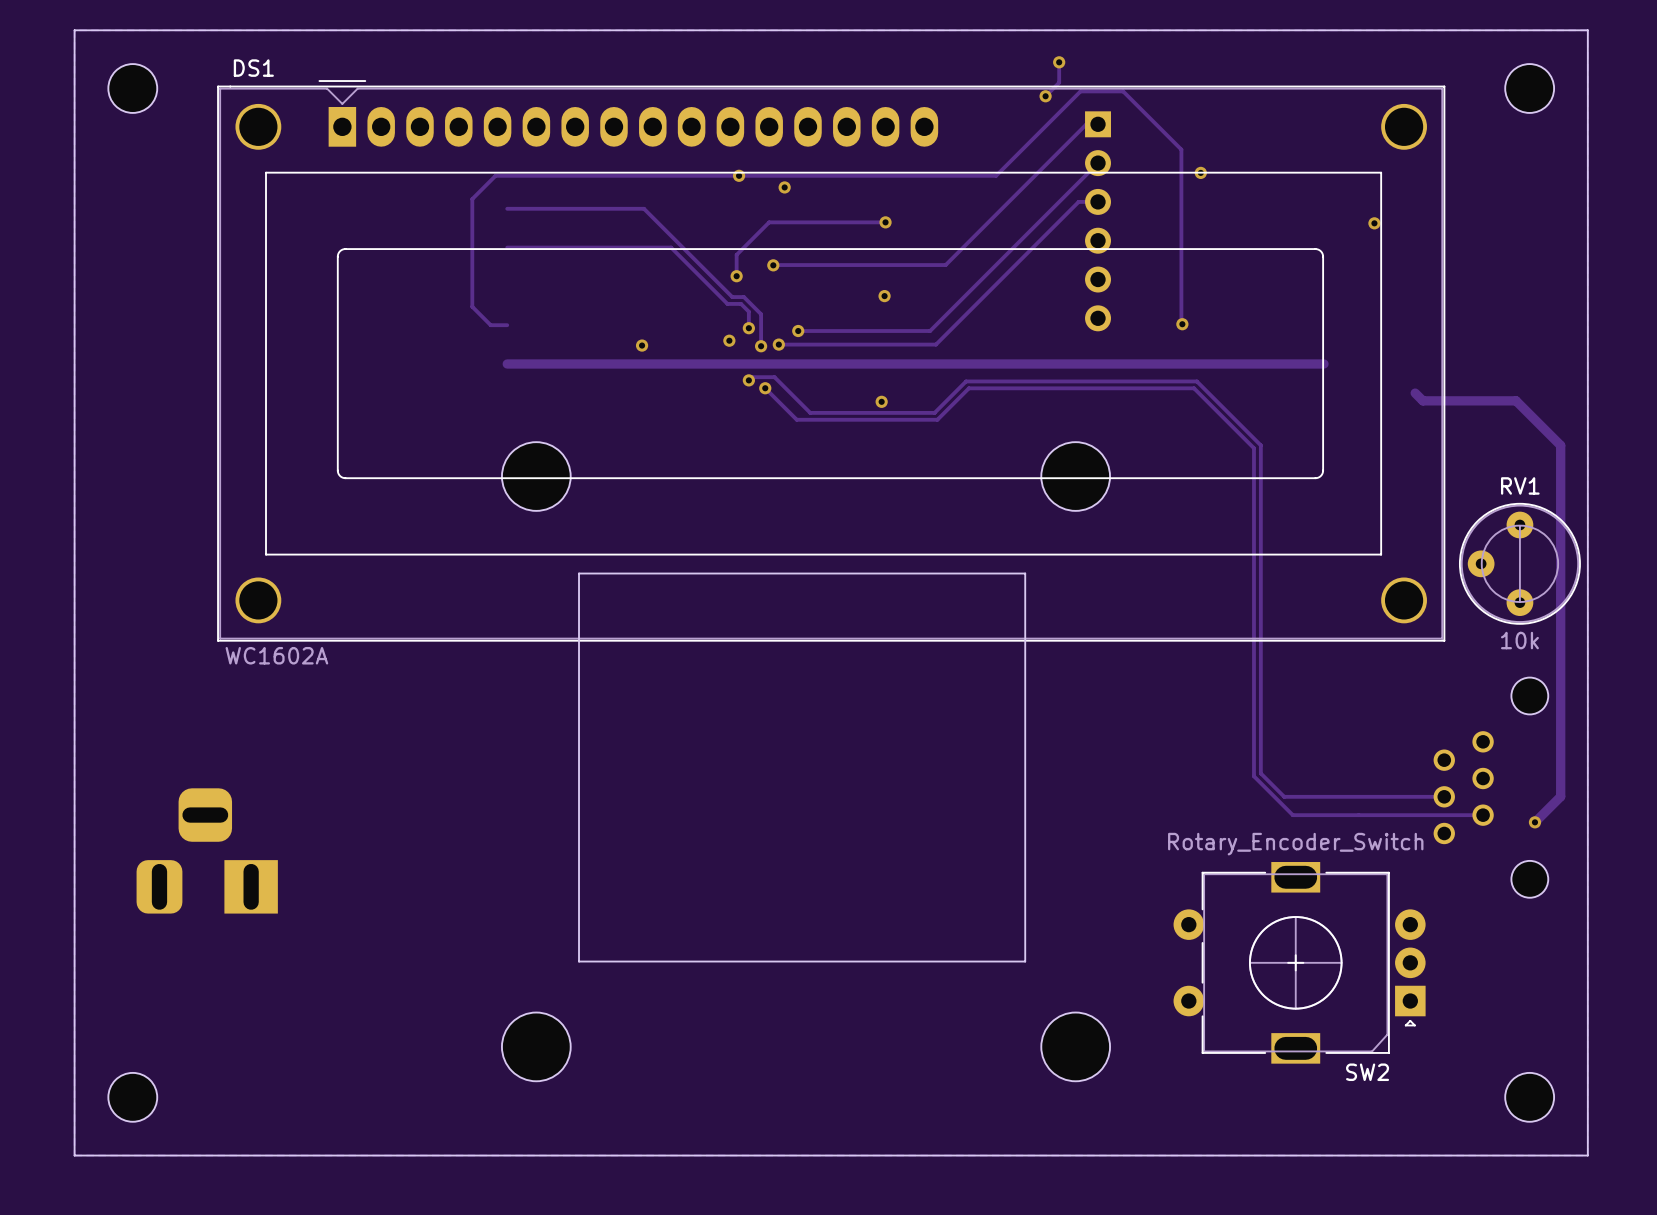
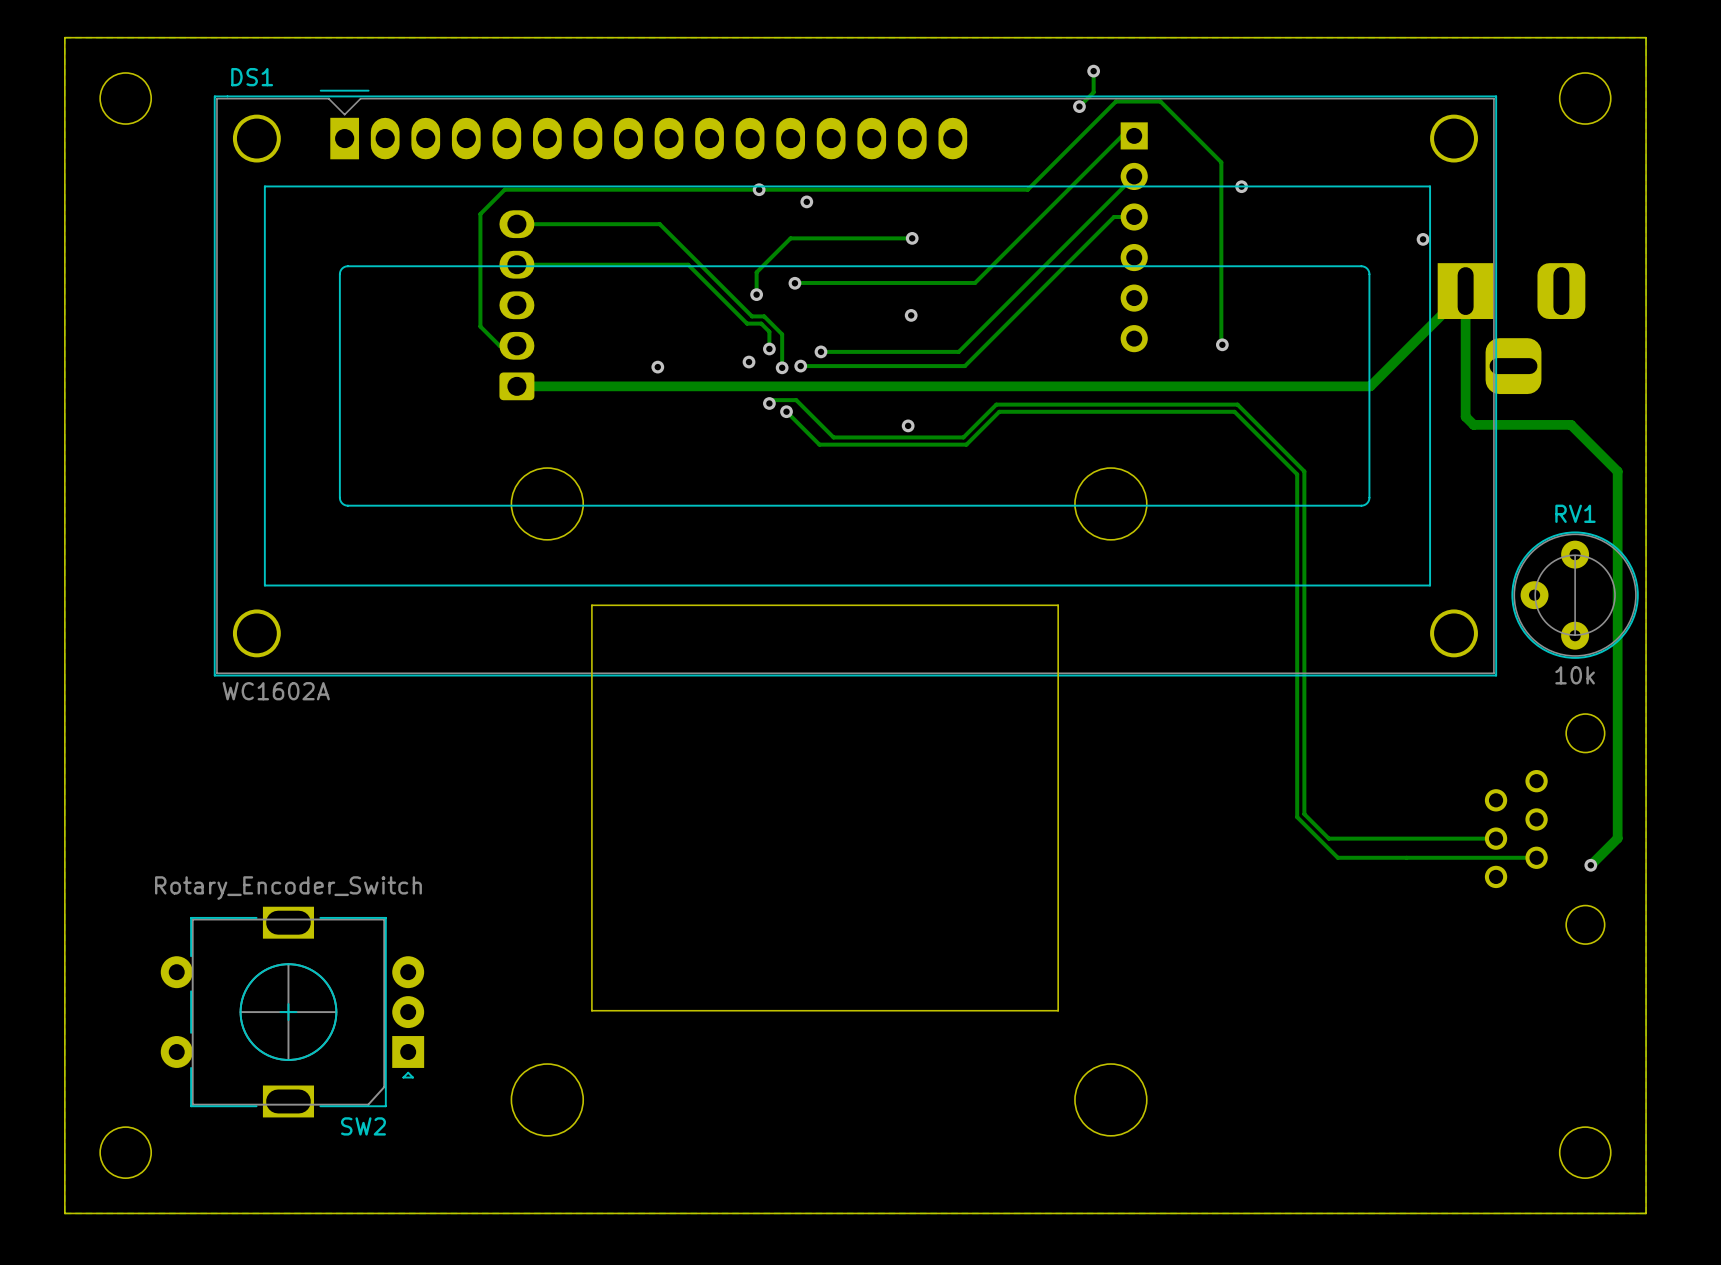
part: none -> (516, 305)
part: none -> (1511, 328)
track: none -> (1370, 386) (1465, 291) (1465, 416)
part: (207, 850) -> none
SW2 position: (1299, 962) -> (292, 1012)

